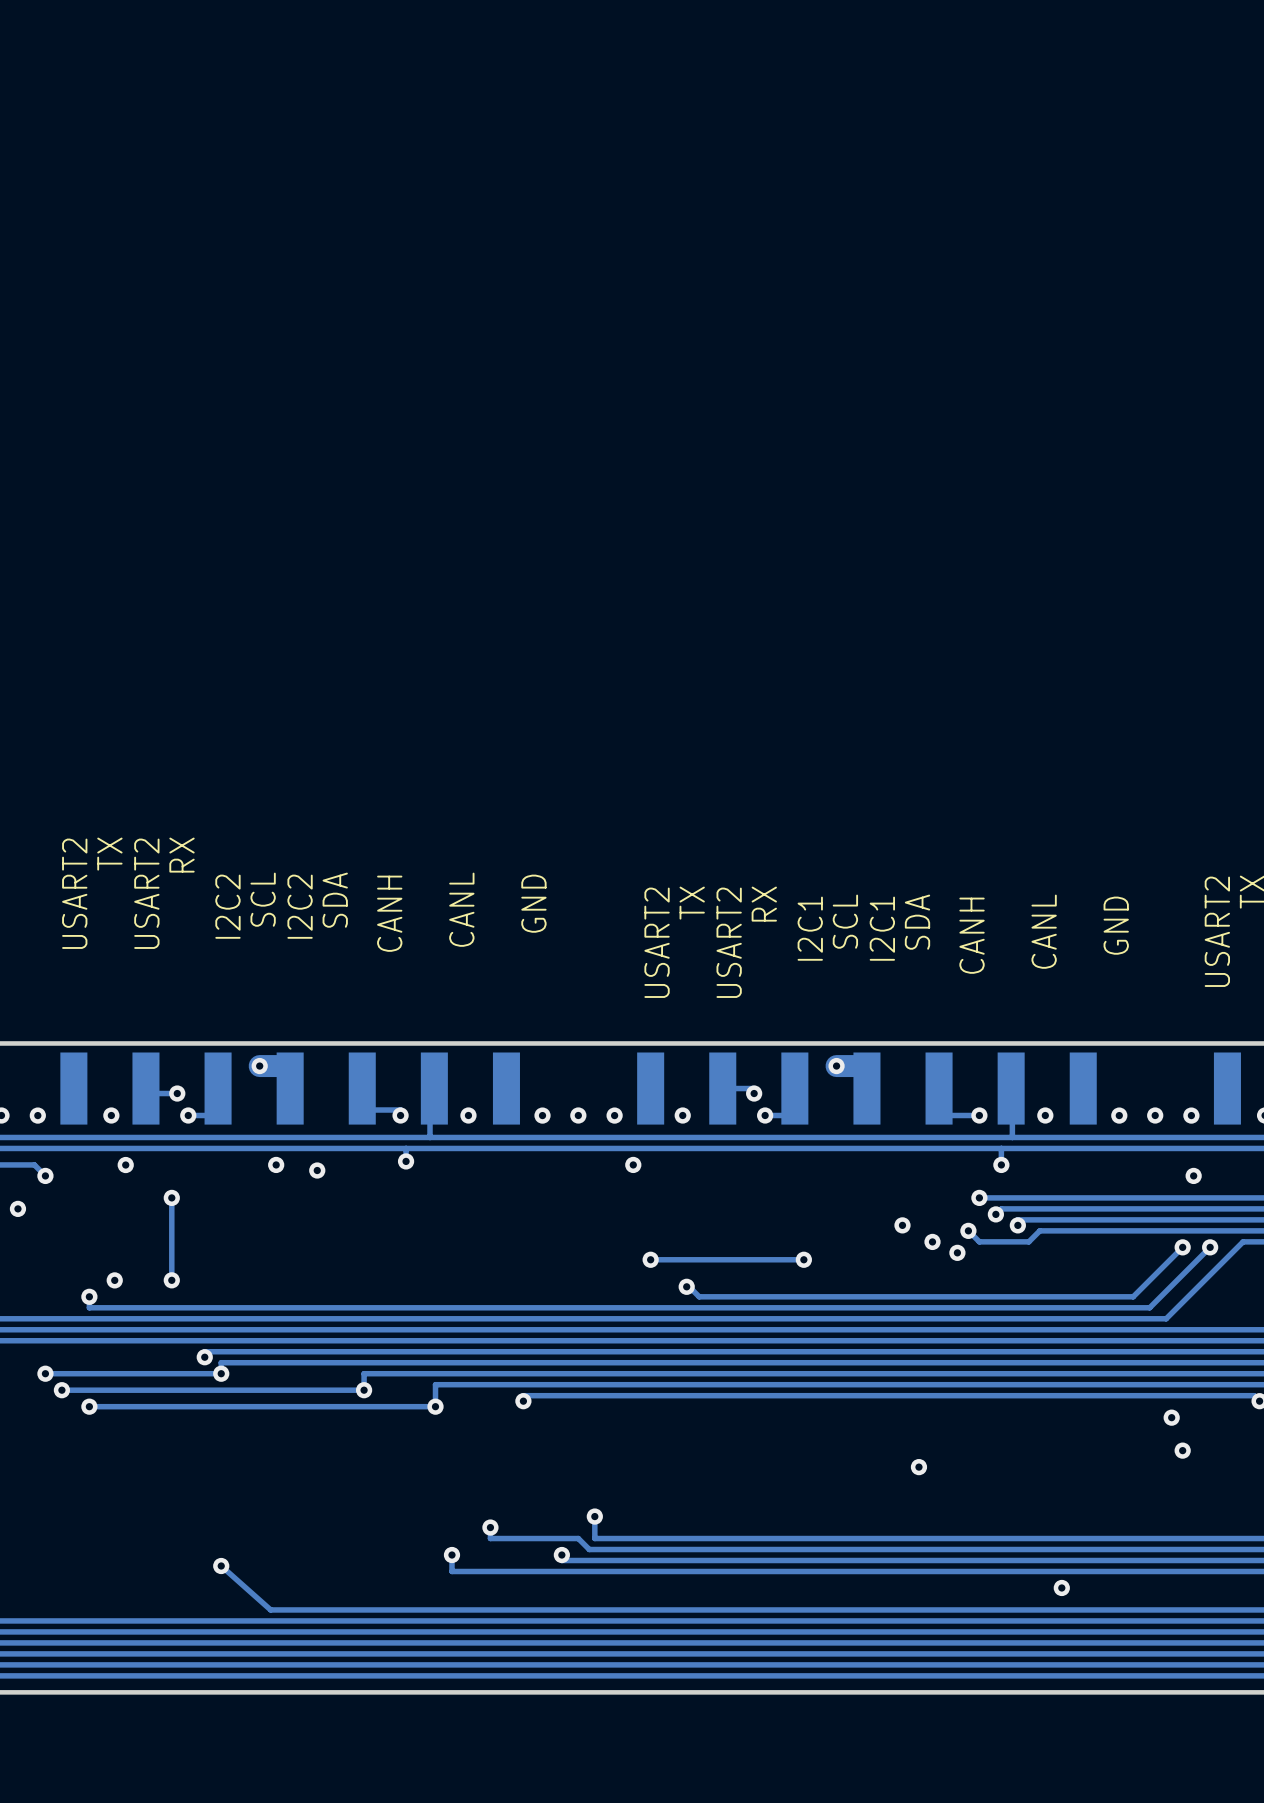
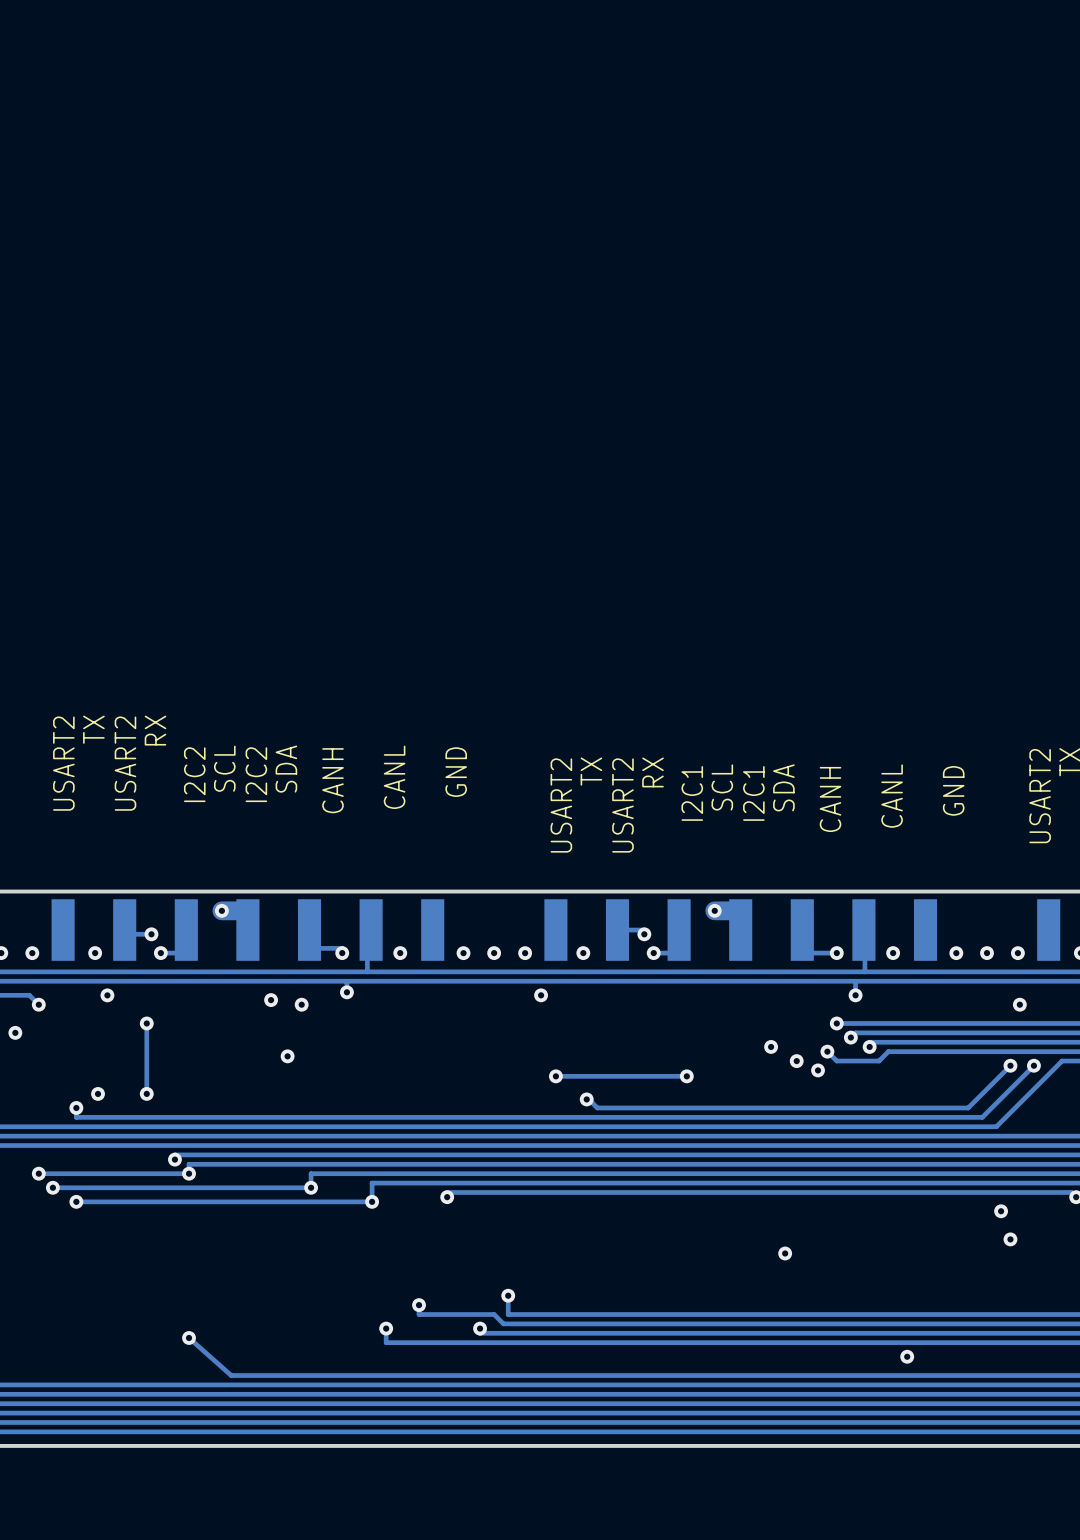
via: (276, 1164) -> none
via: none -> (301, 1004)
via: none -> (287, 1056)

